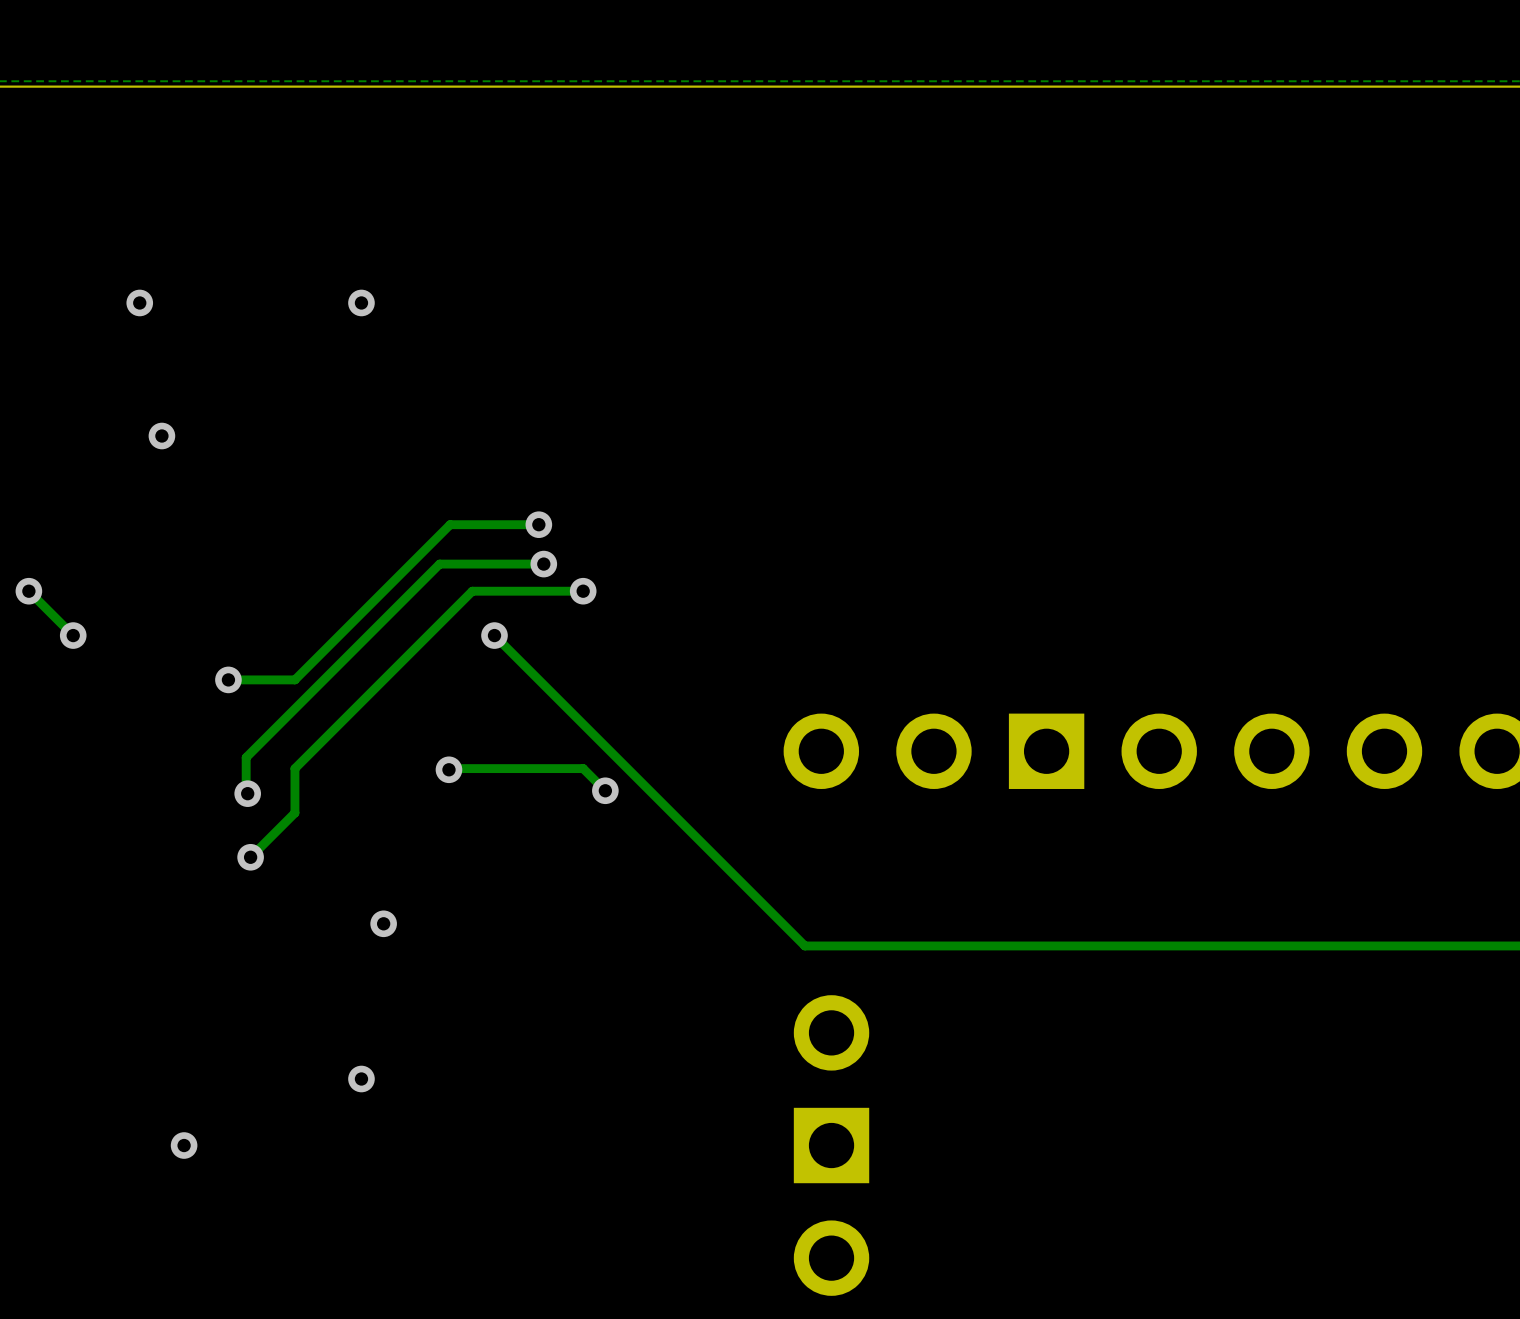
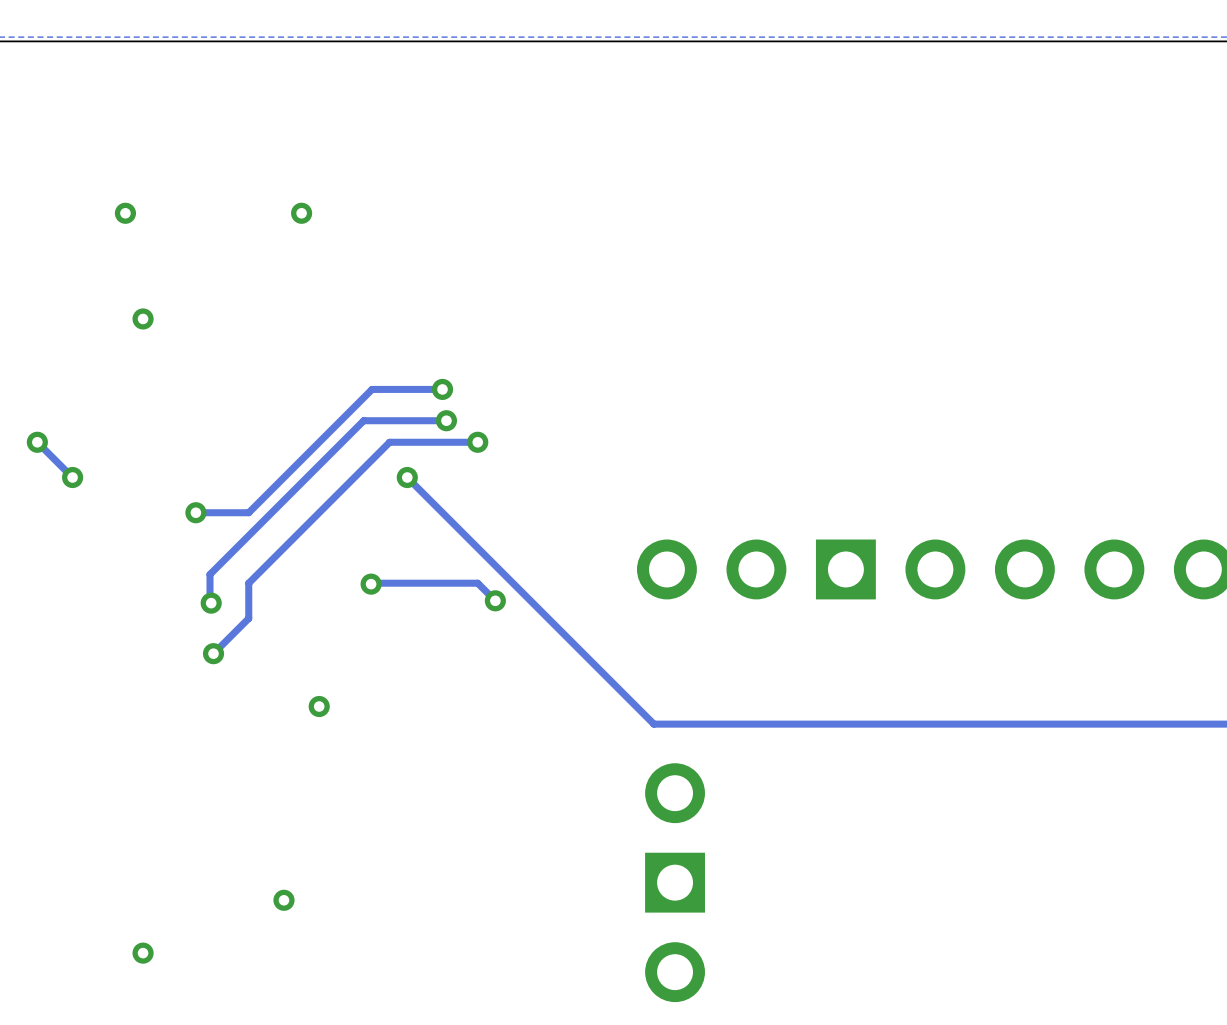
via: (361, 1079) -> none
via: (184, 1145) -> none
via: none -> (283, 900)
via: none -> (143, 953)

